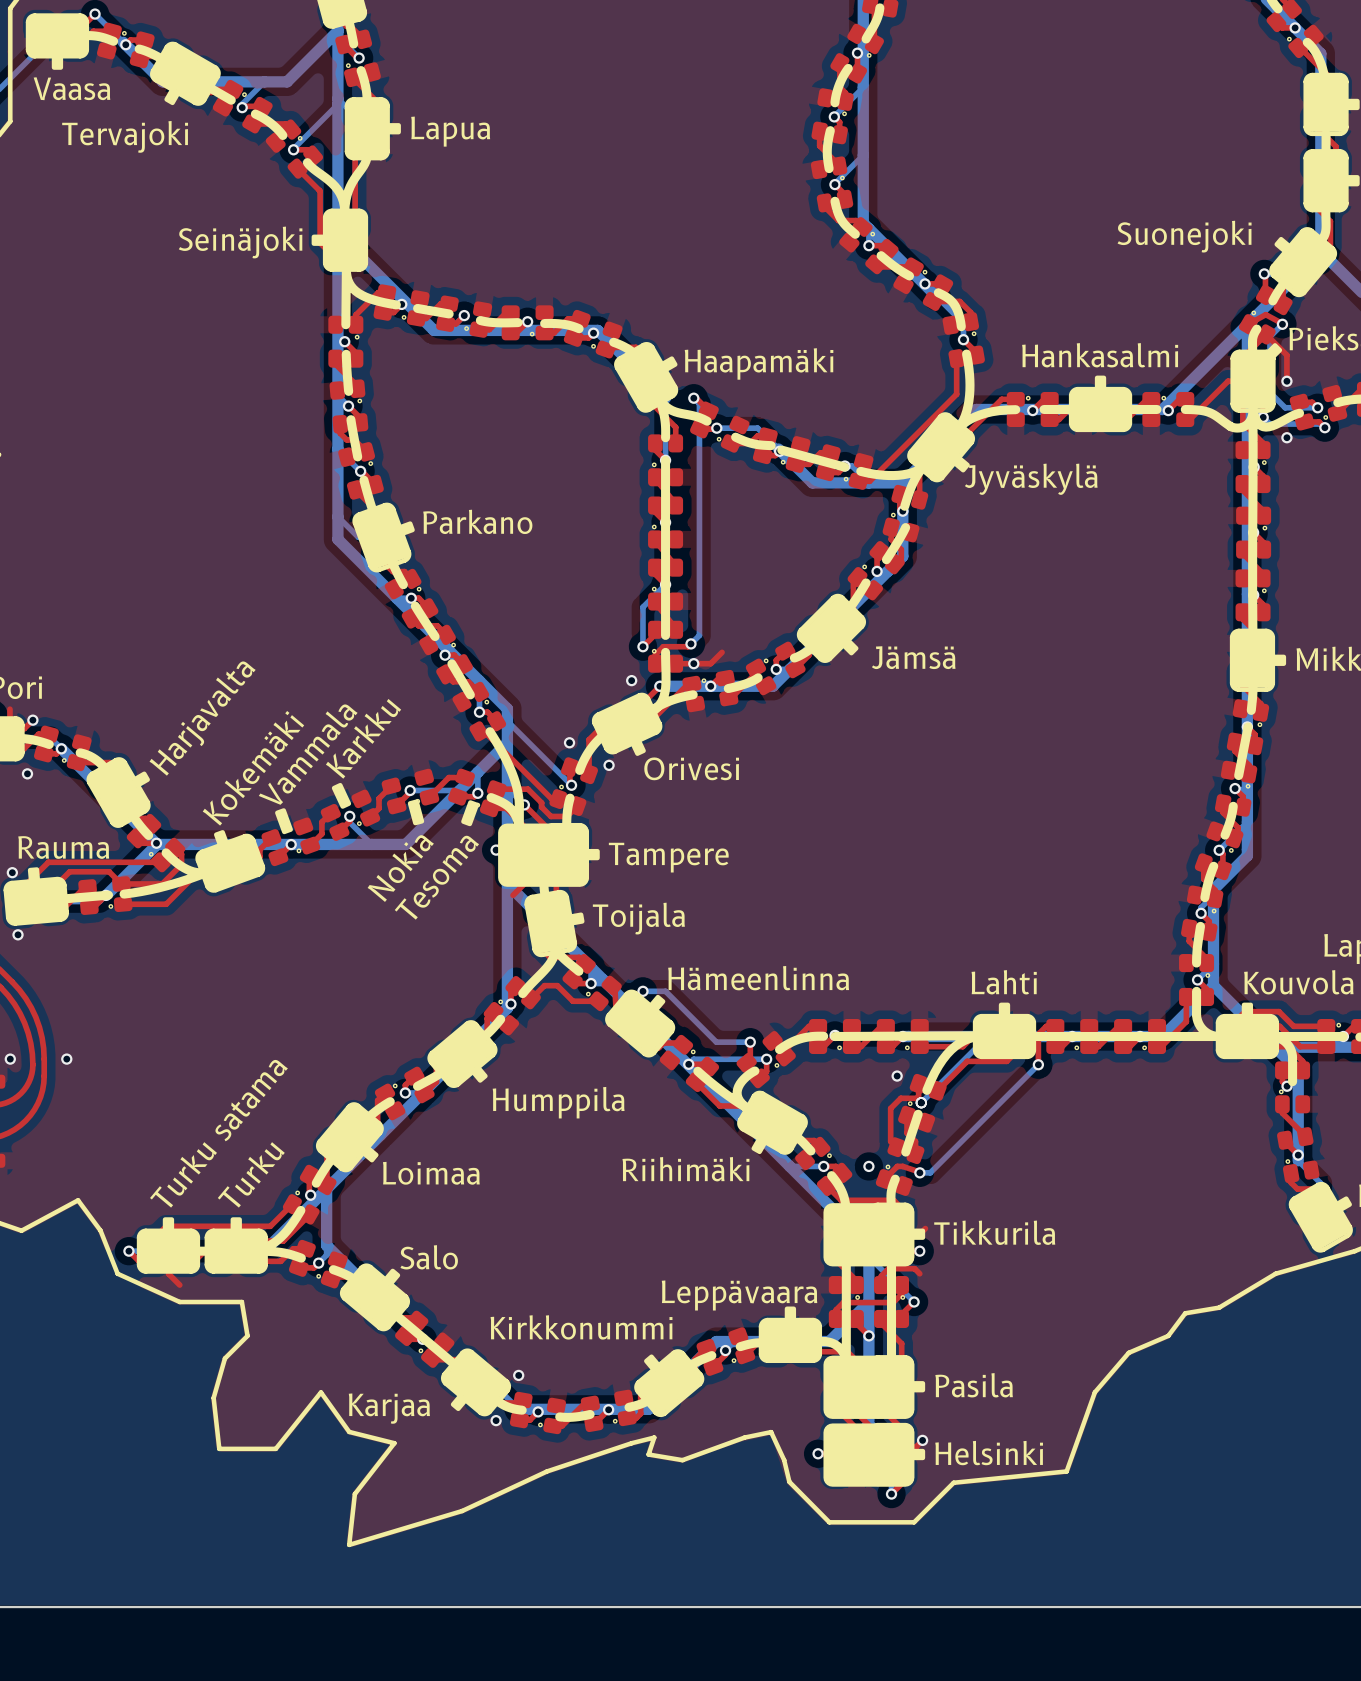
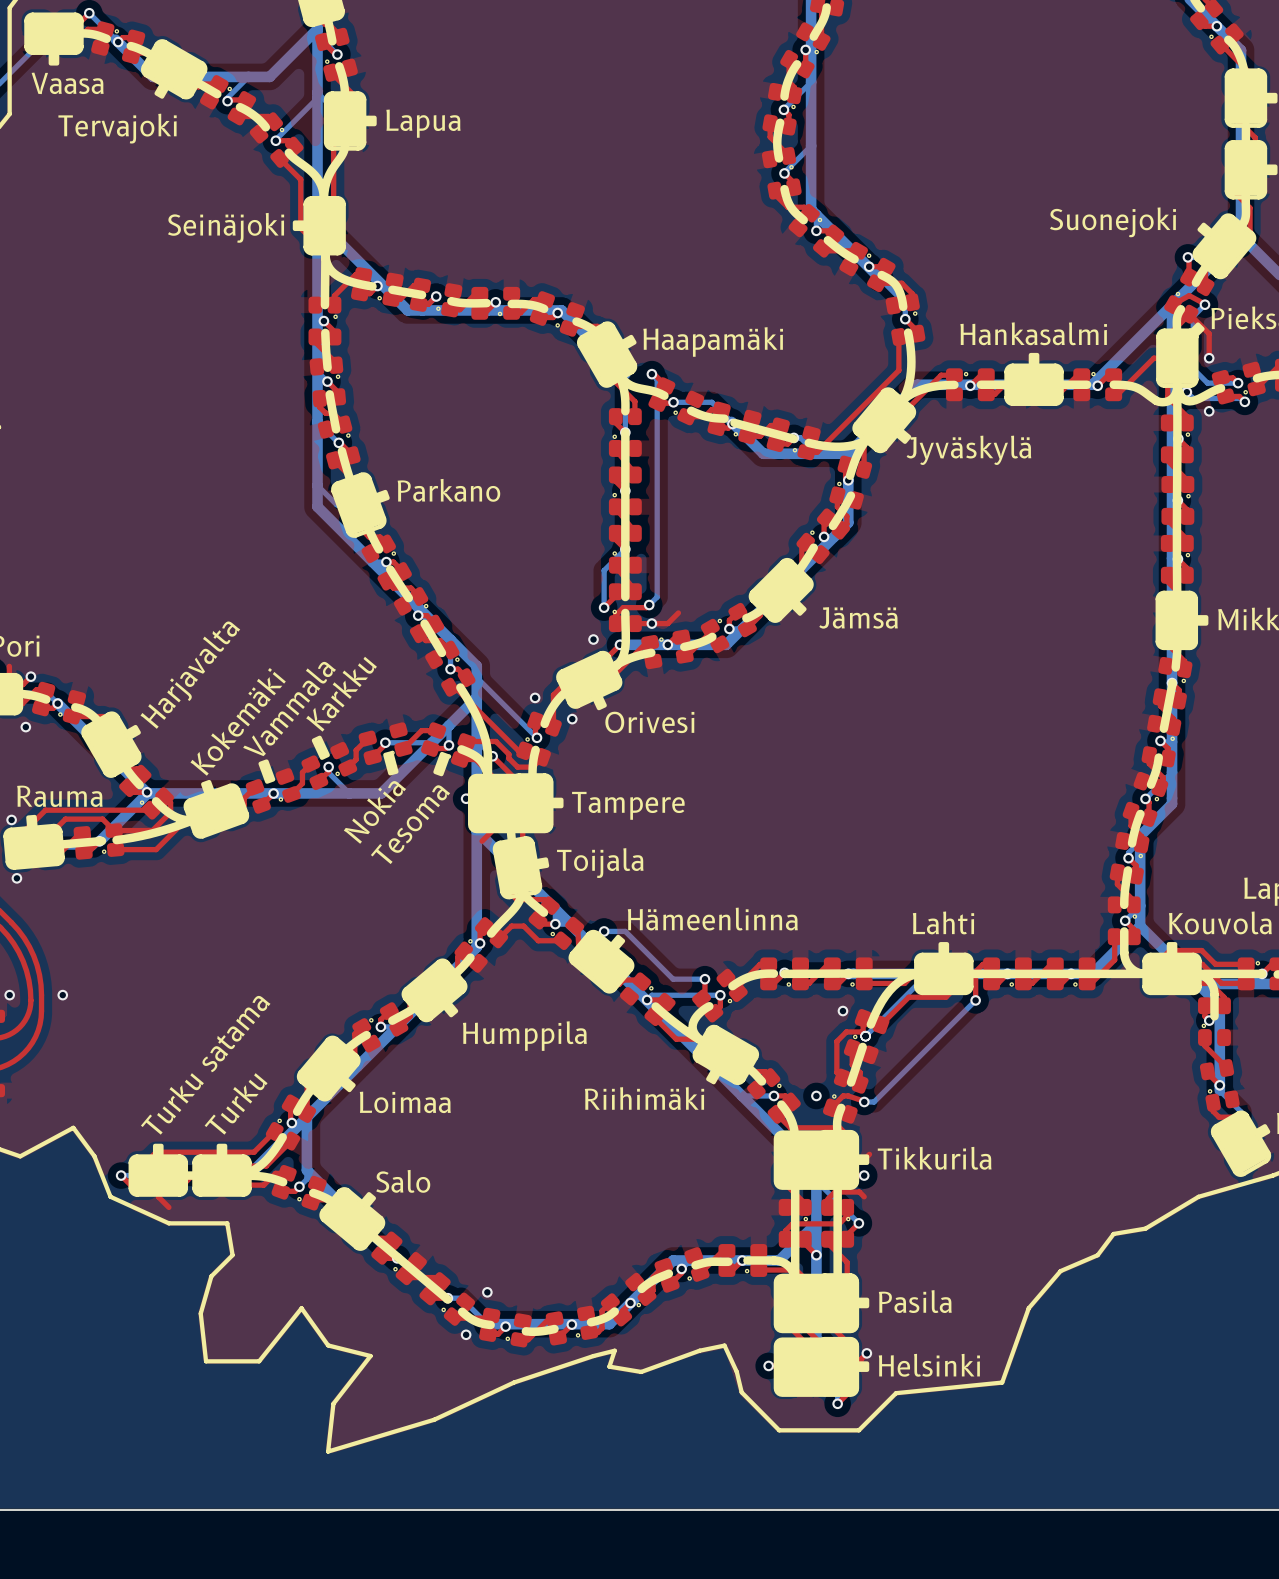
drawing shape: [367, 799, 434, 902] -> [343, 751, 407, 844]
drawing: [440, 1306, 823, 1418] -> none

